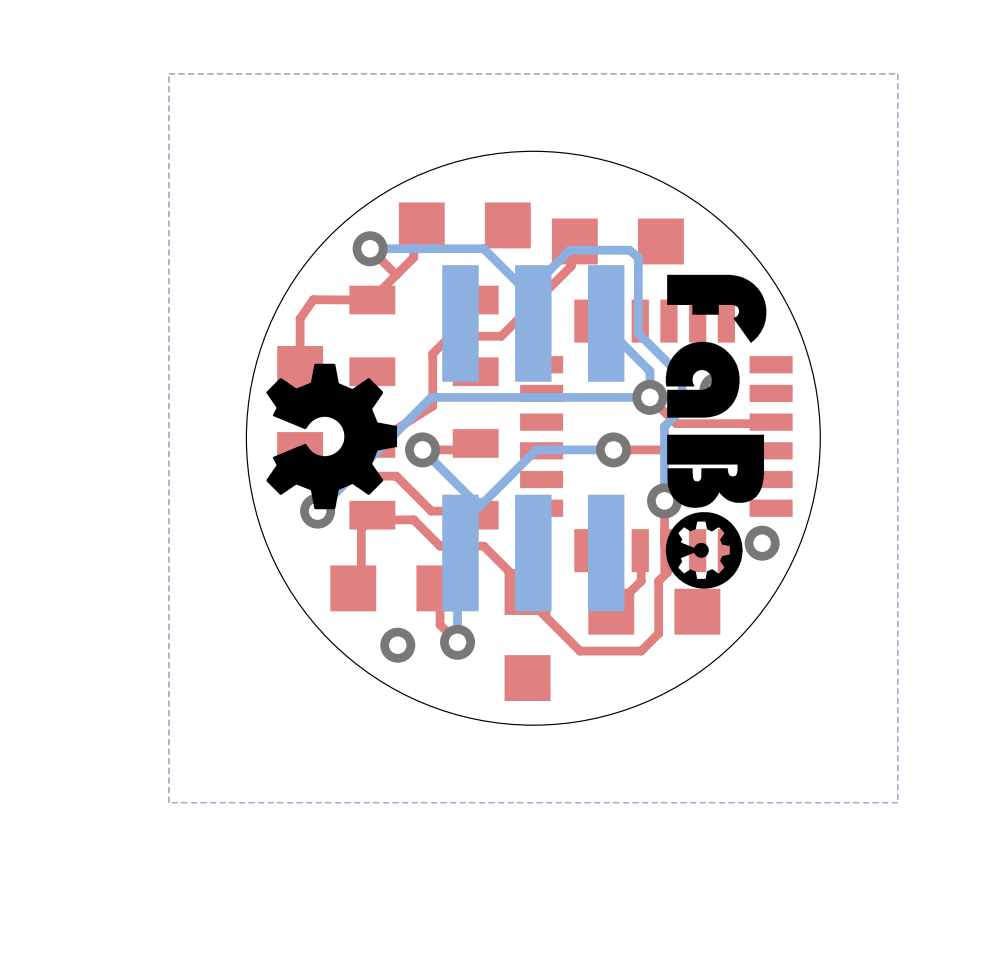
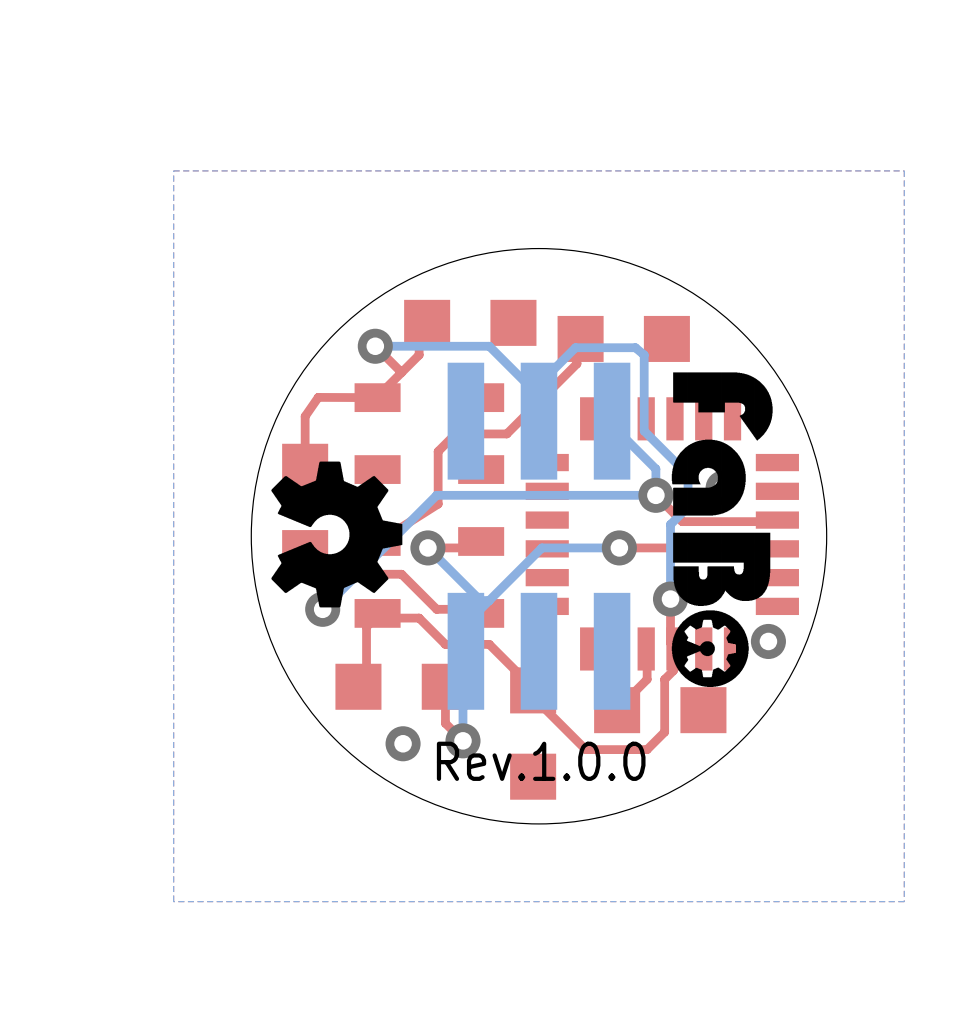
text: none -> Rev.1.0.0 (541, 761)

